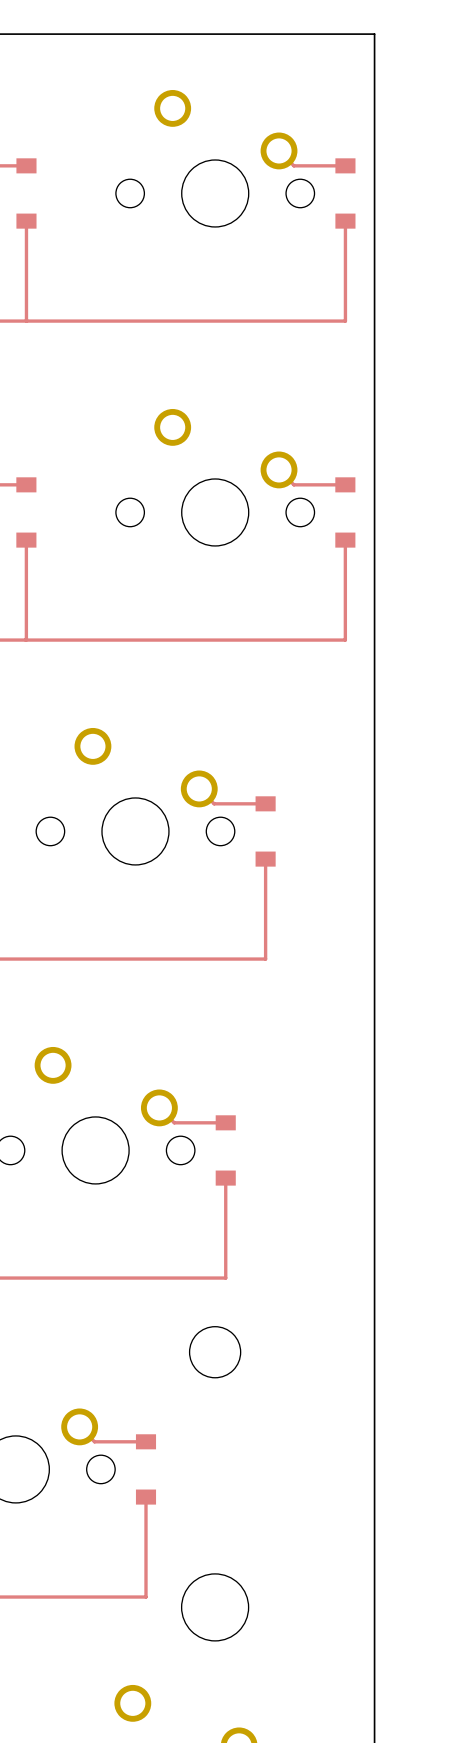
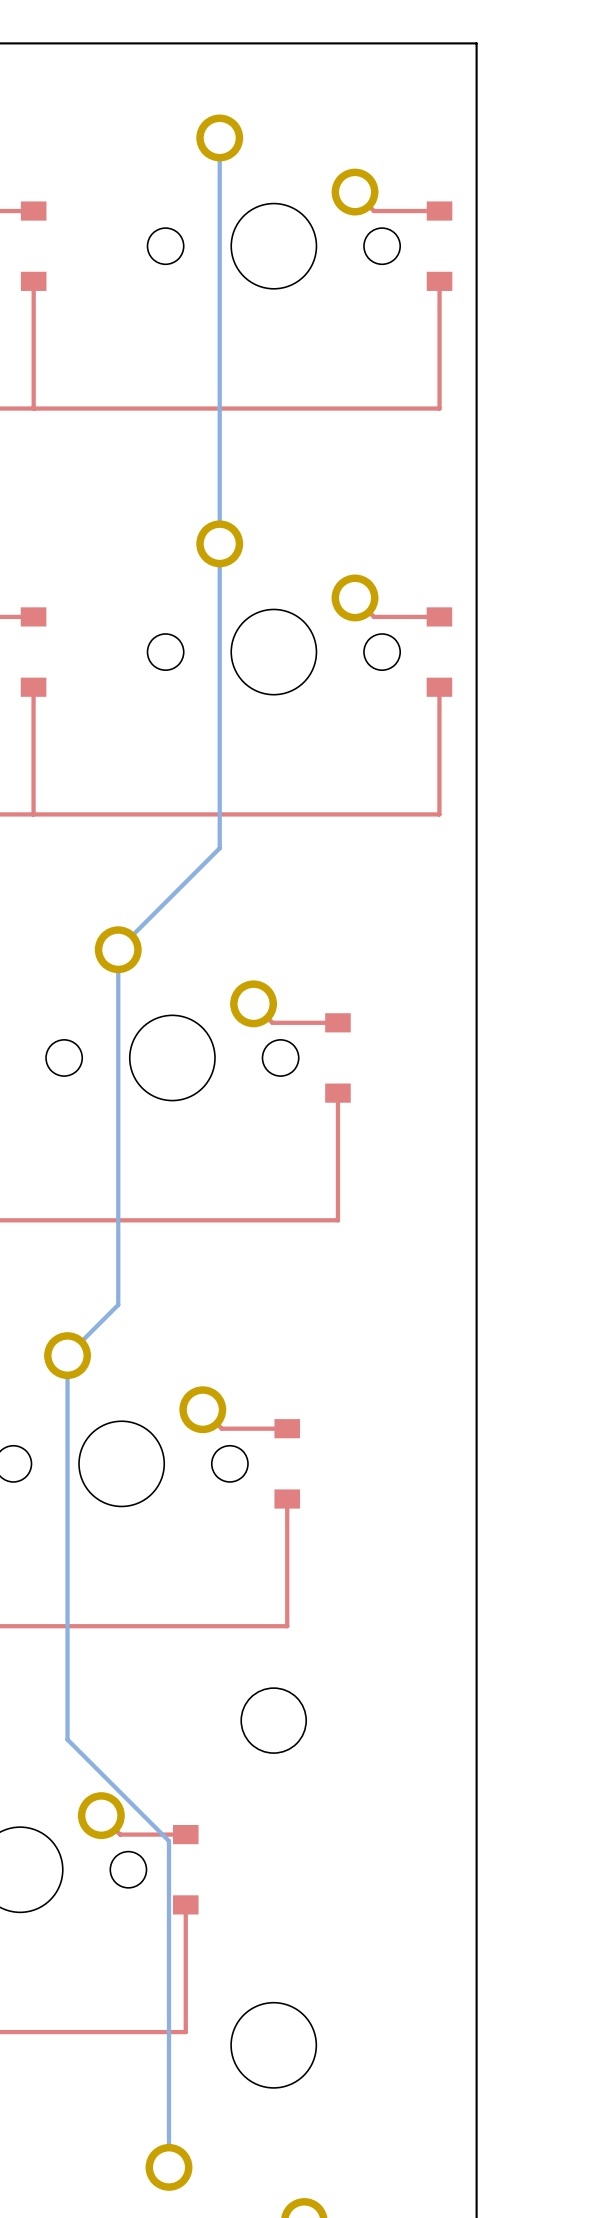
bottom track: none -> (219, 137) (219, 848) (118, 949) (118, 1304) (67, 1355) (67, 1739) (168, 1841) (168, 2167)

